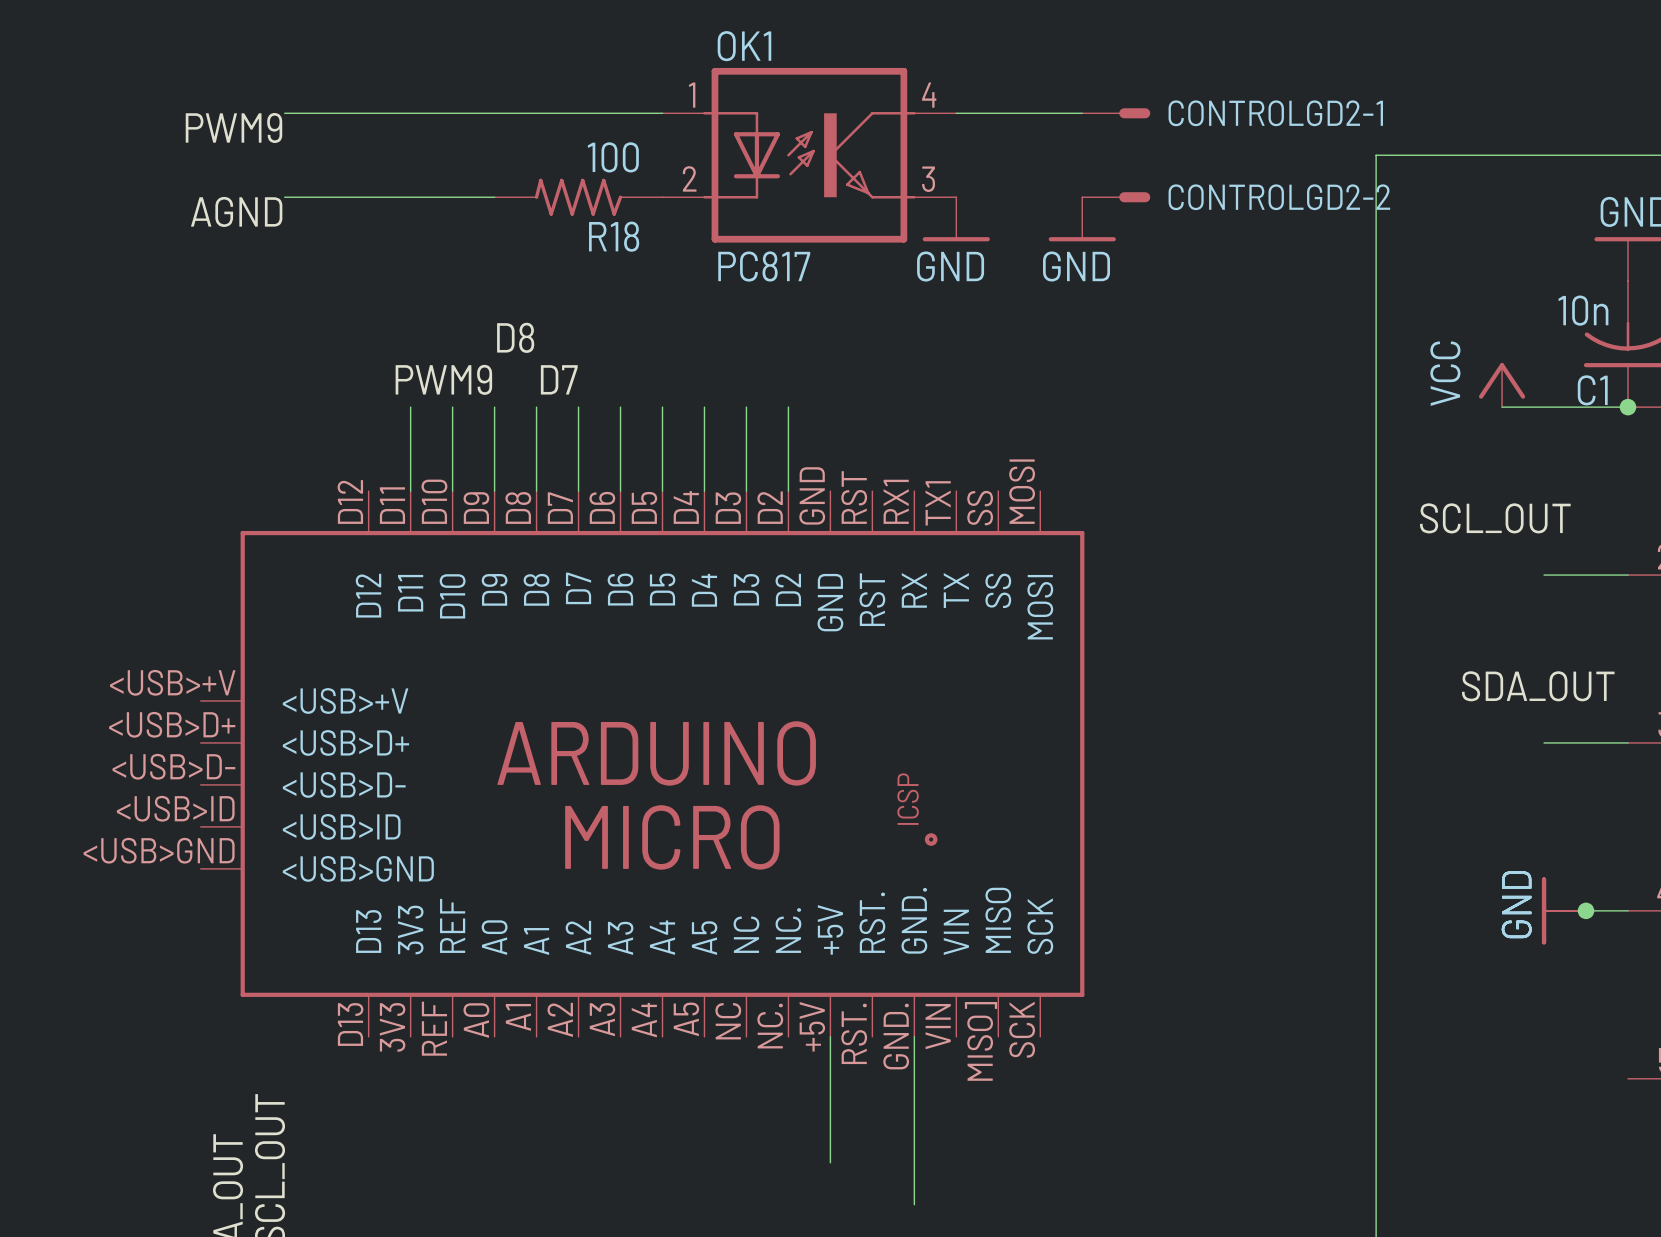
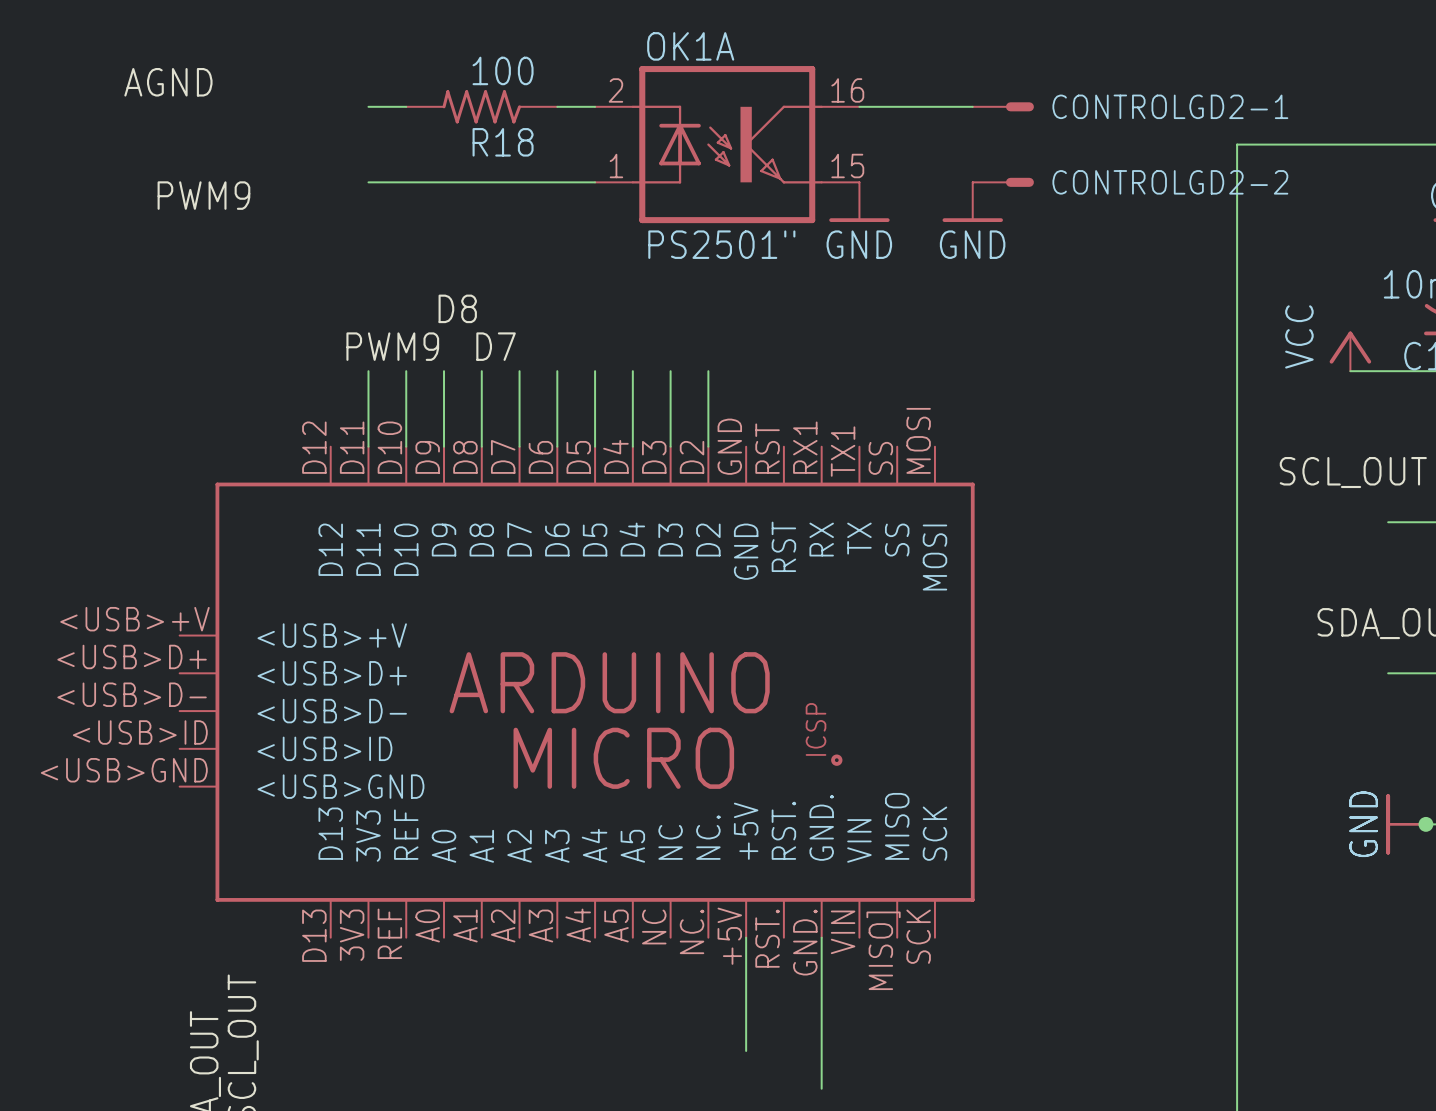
label: none -> AGND (168, 82)
wire: (284, 113) (410, 113) -> none
label: PWM9 (233, 128) -> none
OK1: PC817 (809, 155) -> none
OK1A: none -> PS2501" (727, 144)
wire: (284, 197) (410, 197) -> none
R18 position: (578, 197) -> (481, 106)
label: AGND (236, 211) -> PWM9 (203, 195)

